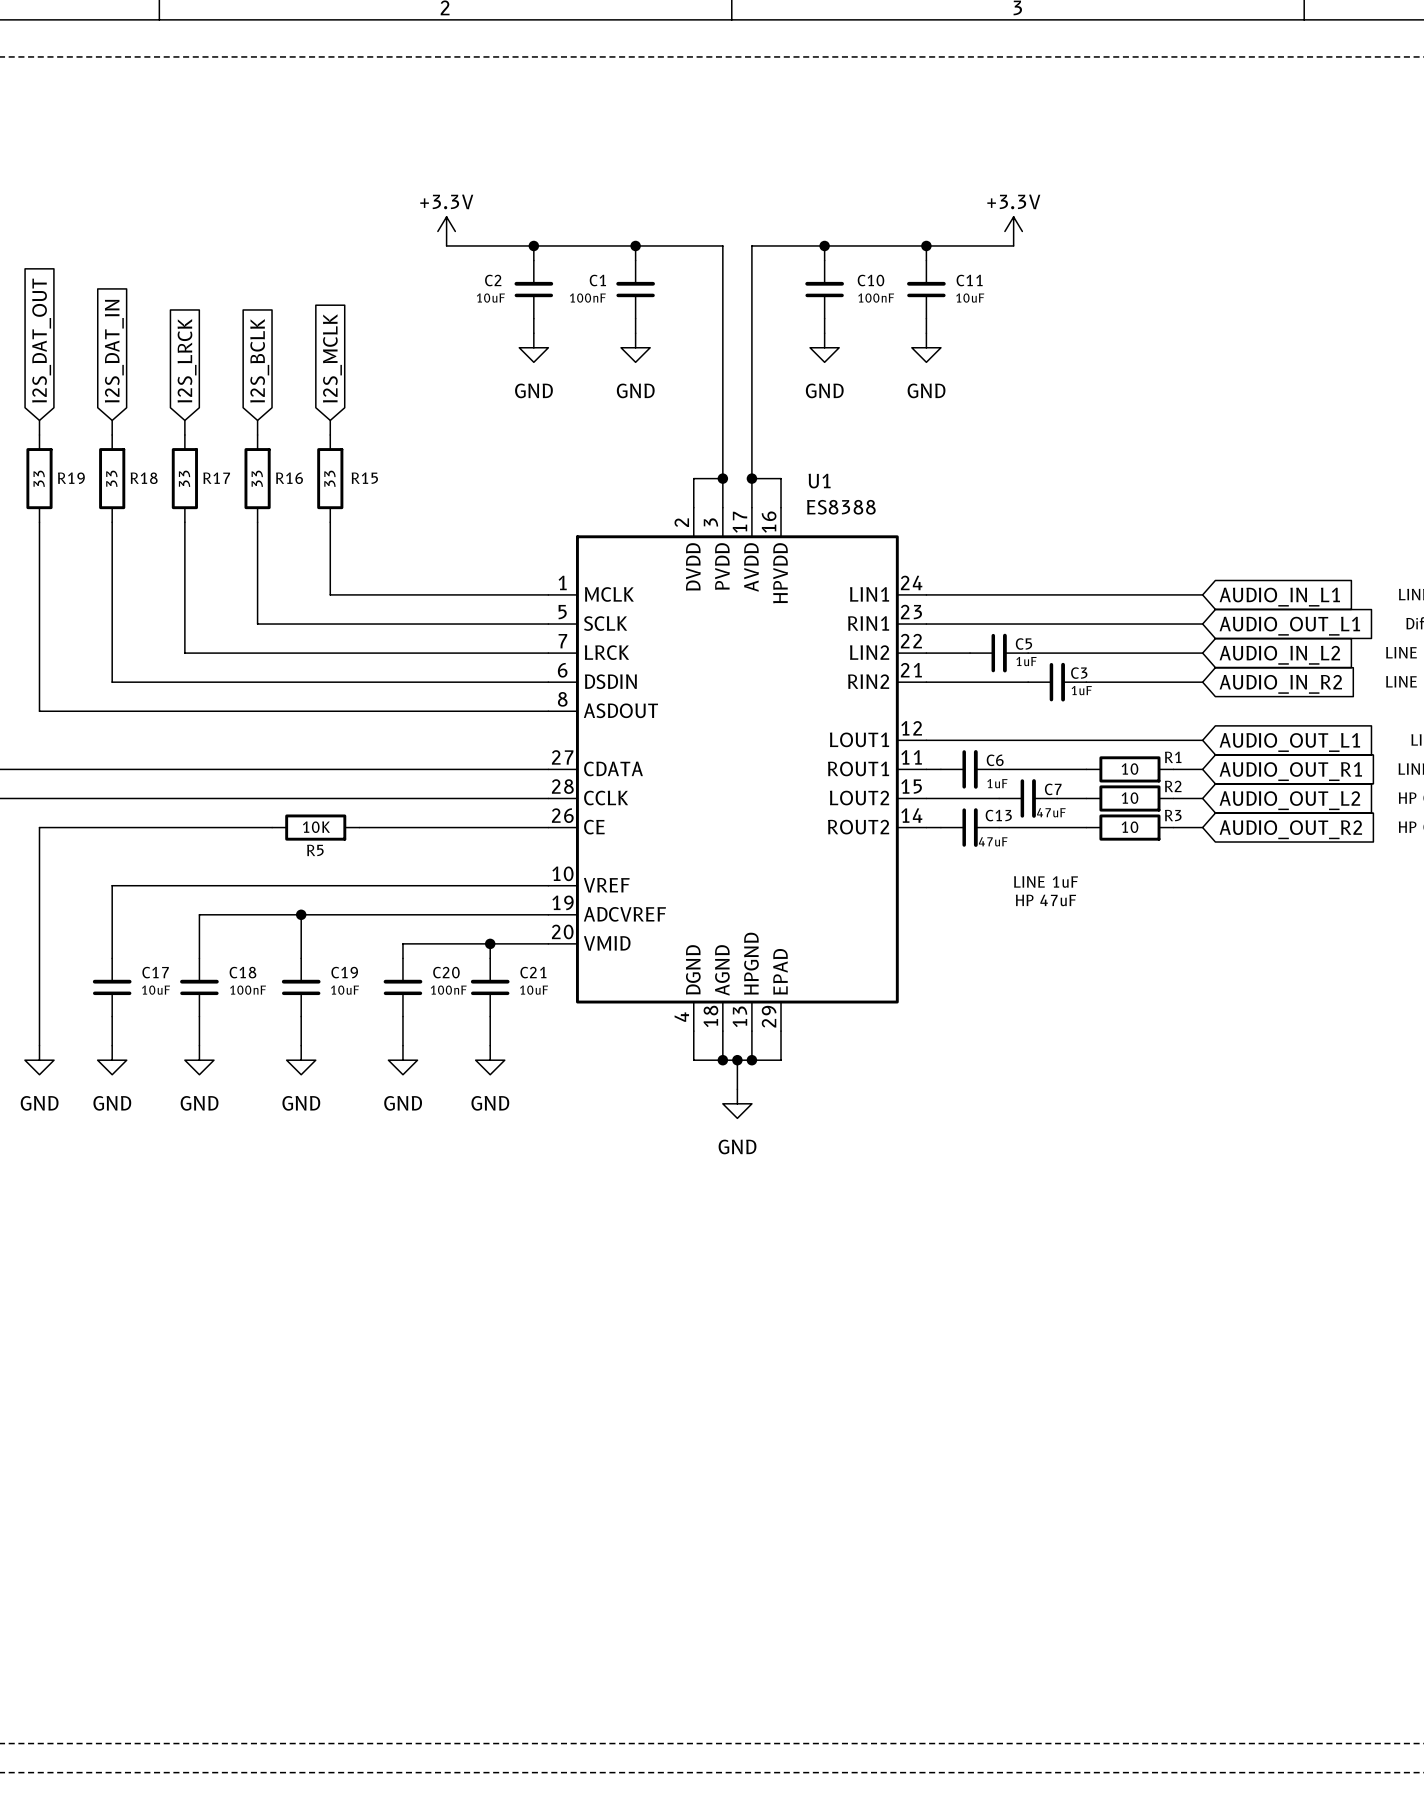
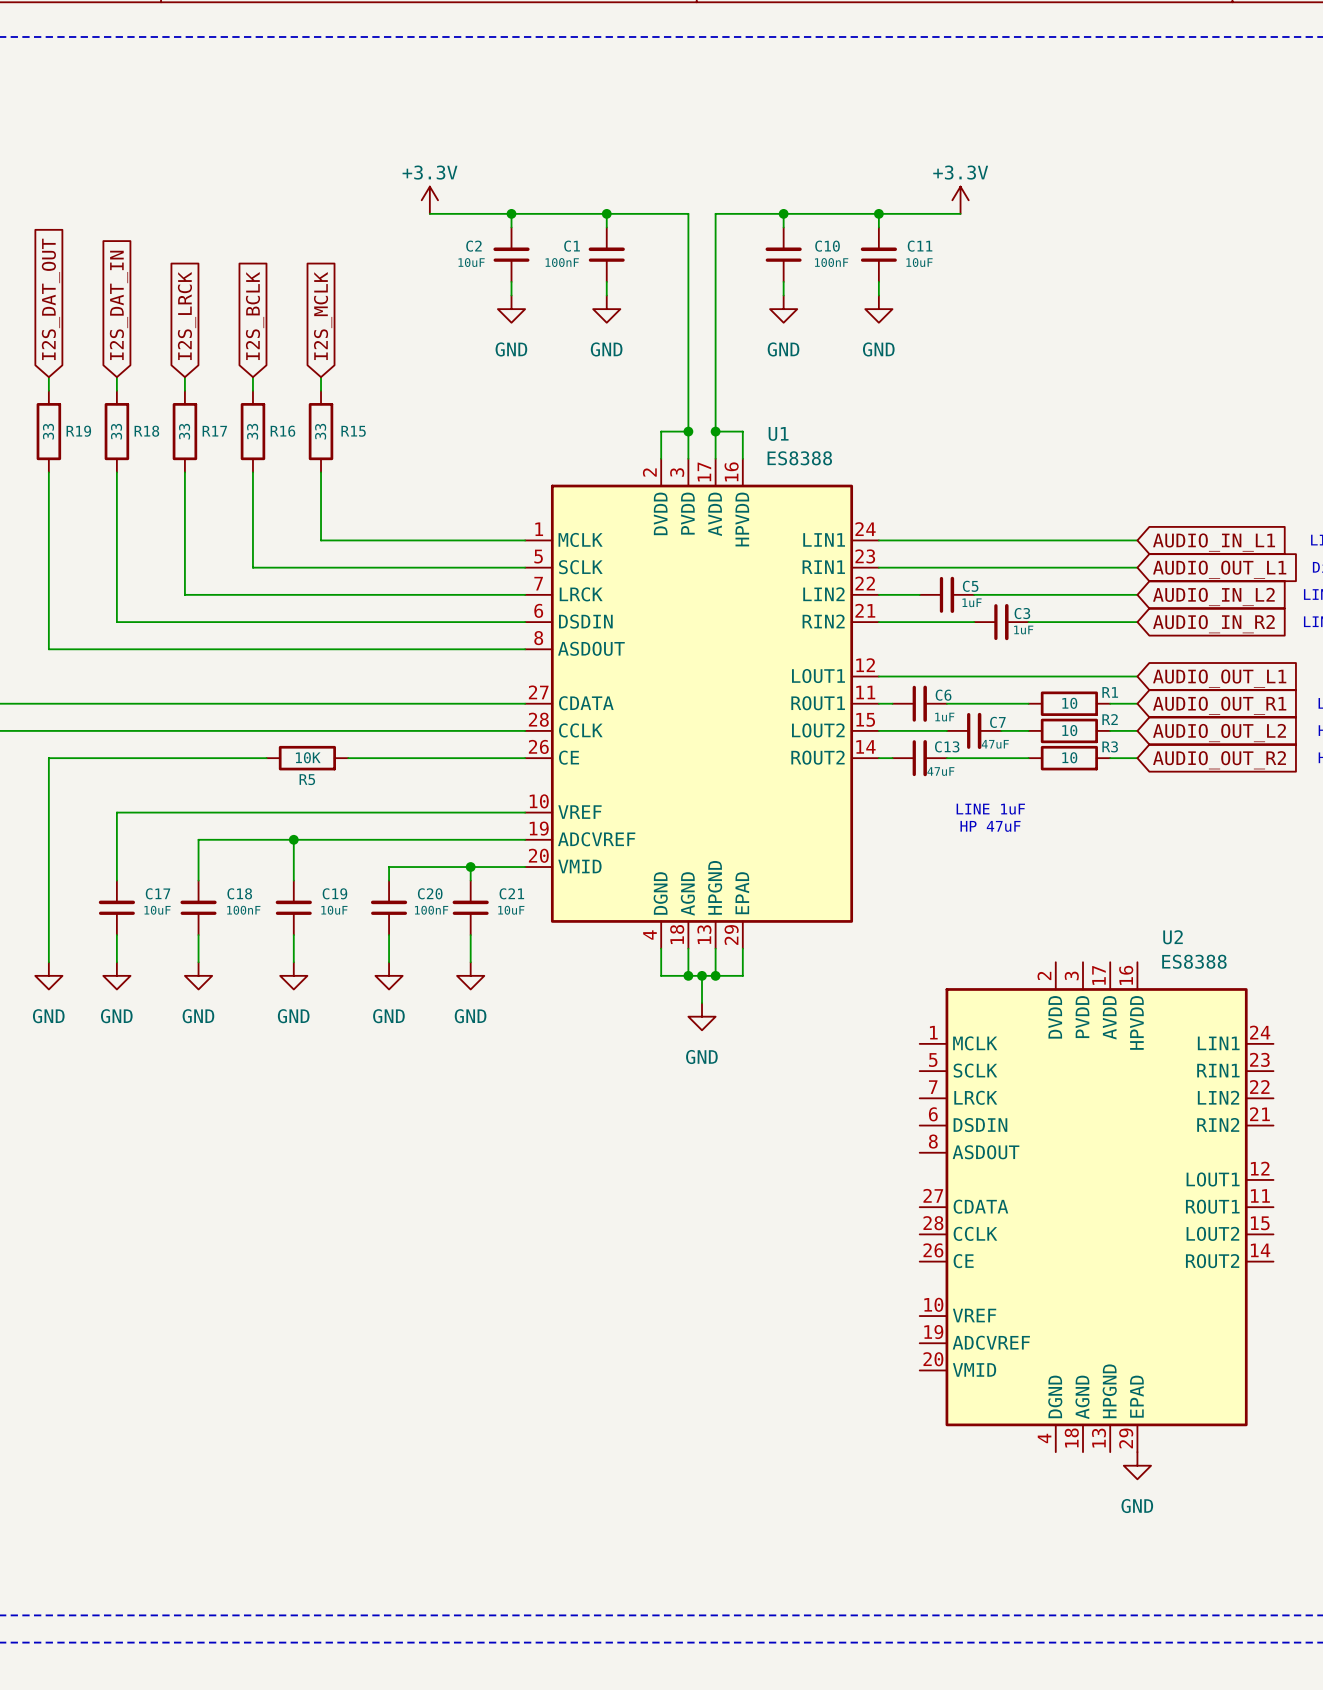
U2: none -> ES8388 (1096, 1207)
power symbol: none -> GND (1137, 1465)

